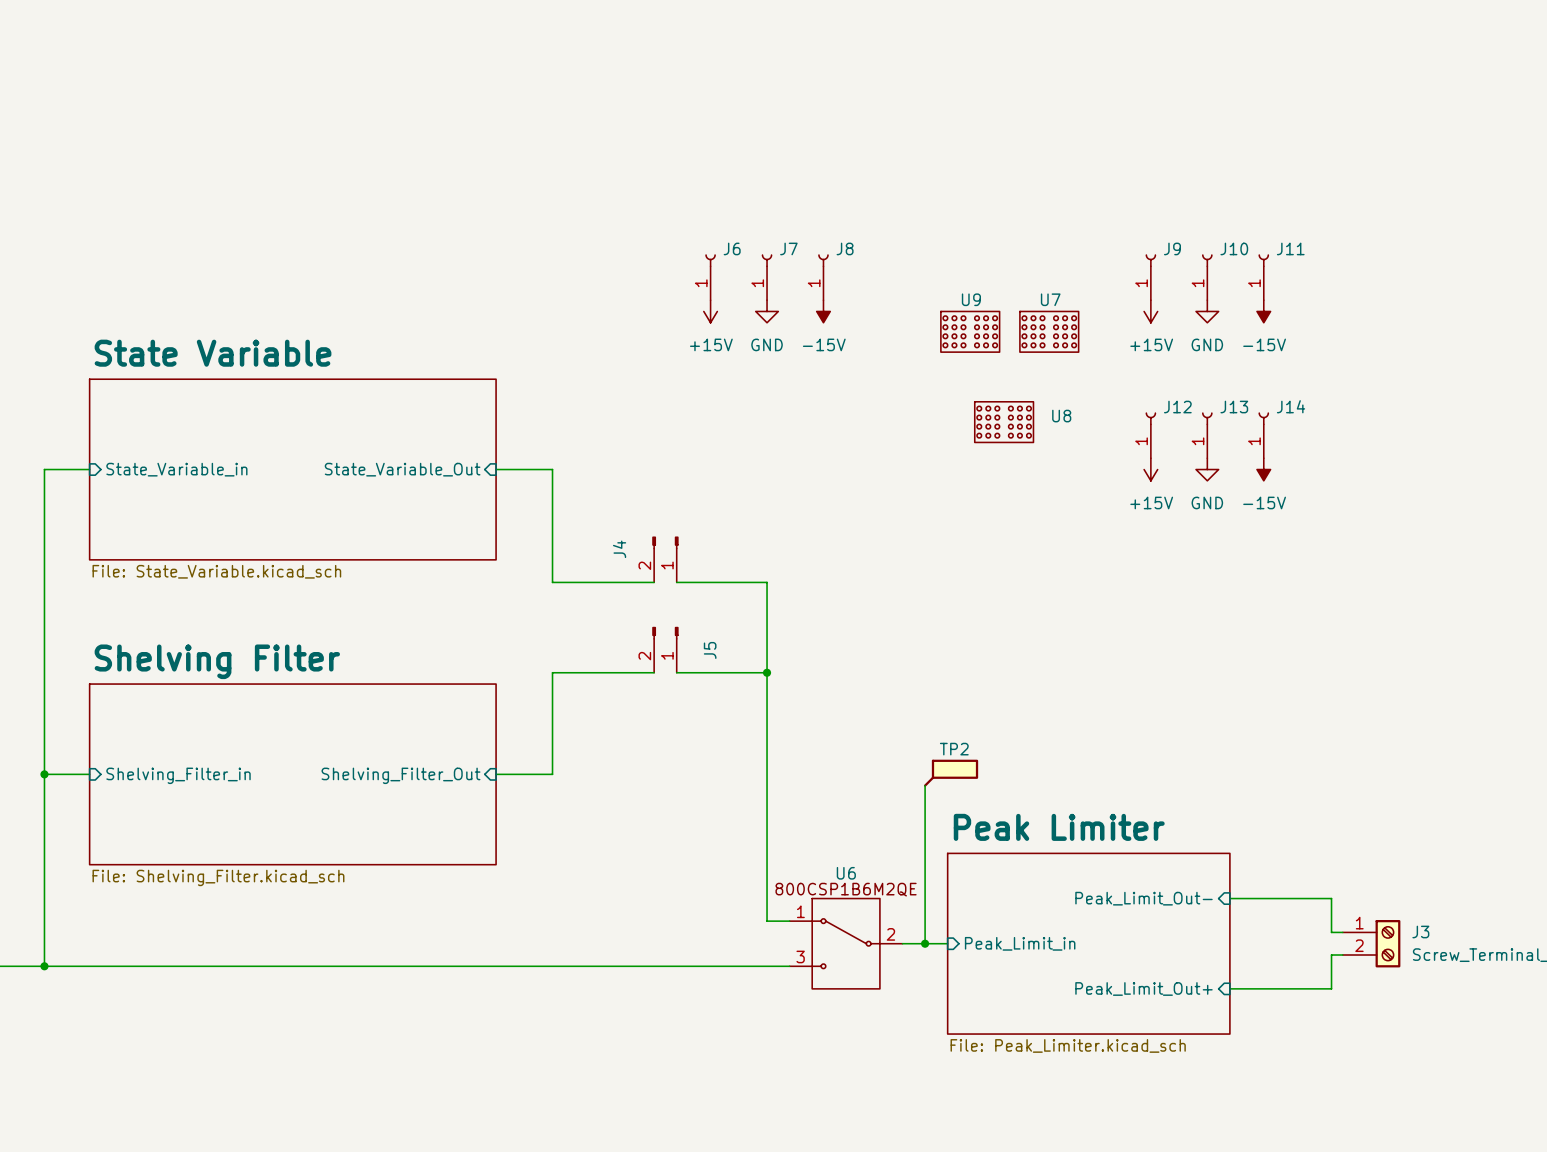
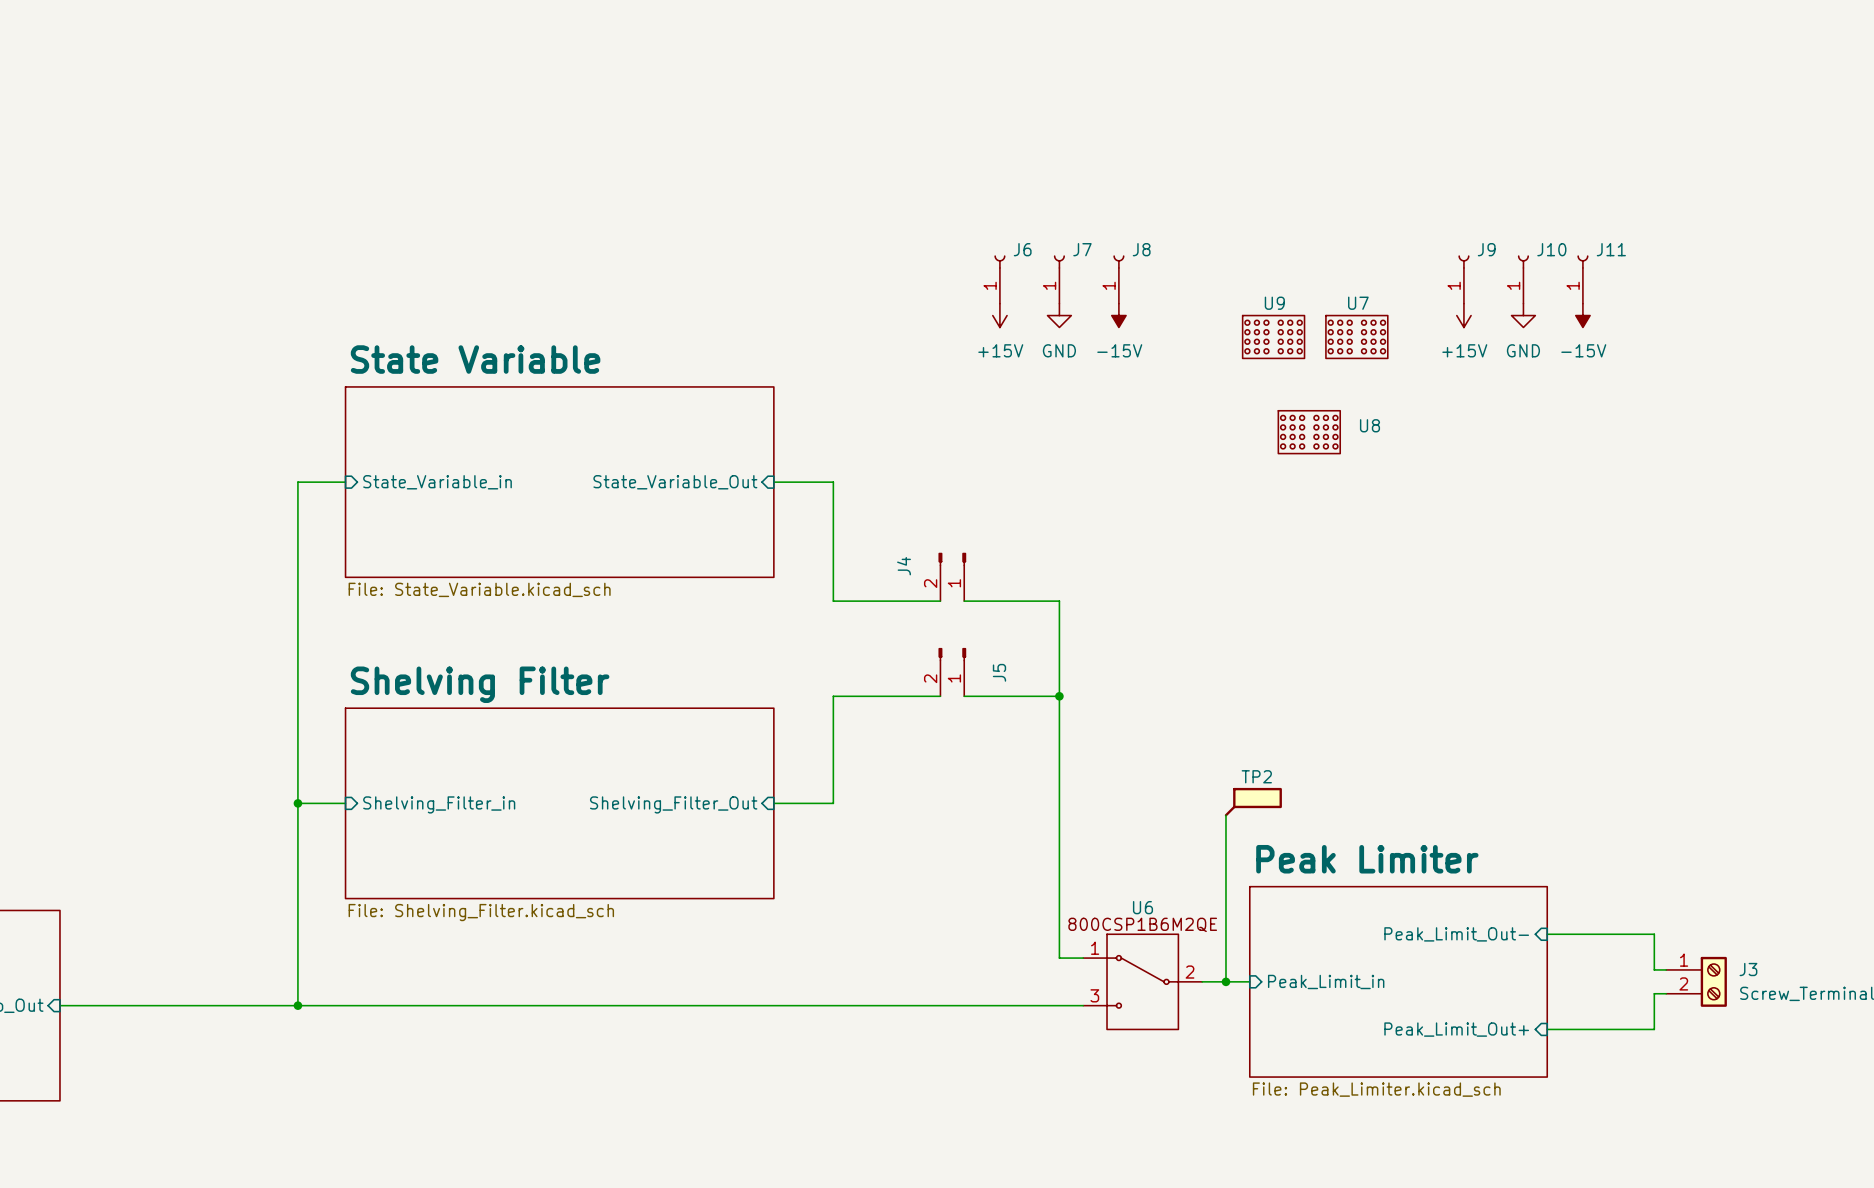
J12: (1150, 435) -> none
J13: (1207, 435) -> none
J14: (1263, 435) -> none
power symbol: +15V (1150, 469) -> none
power symbol: GND (1207, 469) -> none
power symbol: -15V (1263, 469) -> none

